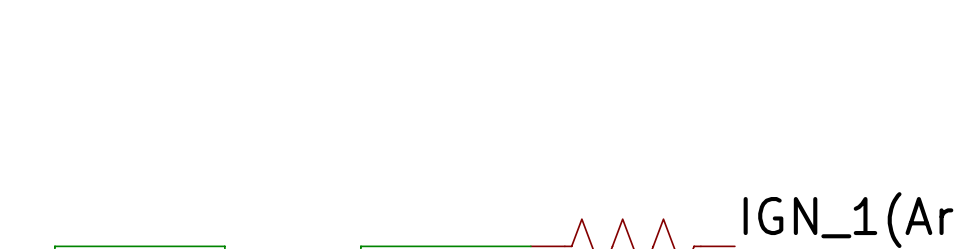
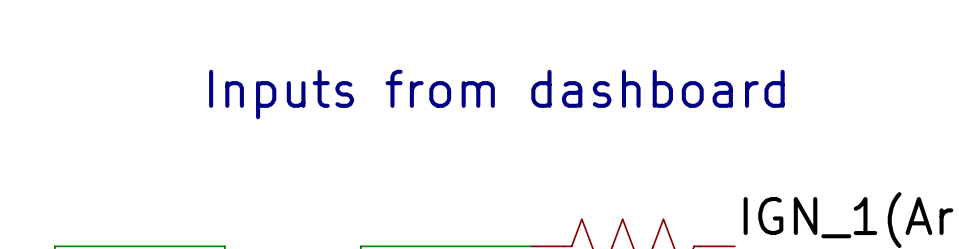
text: none -> Inputs from dashboard (496, 94)

